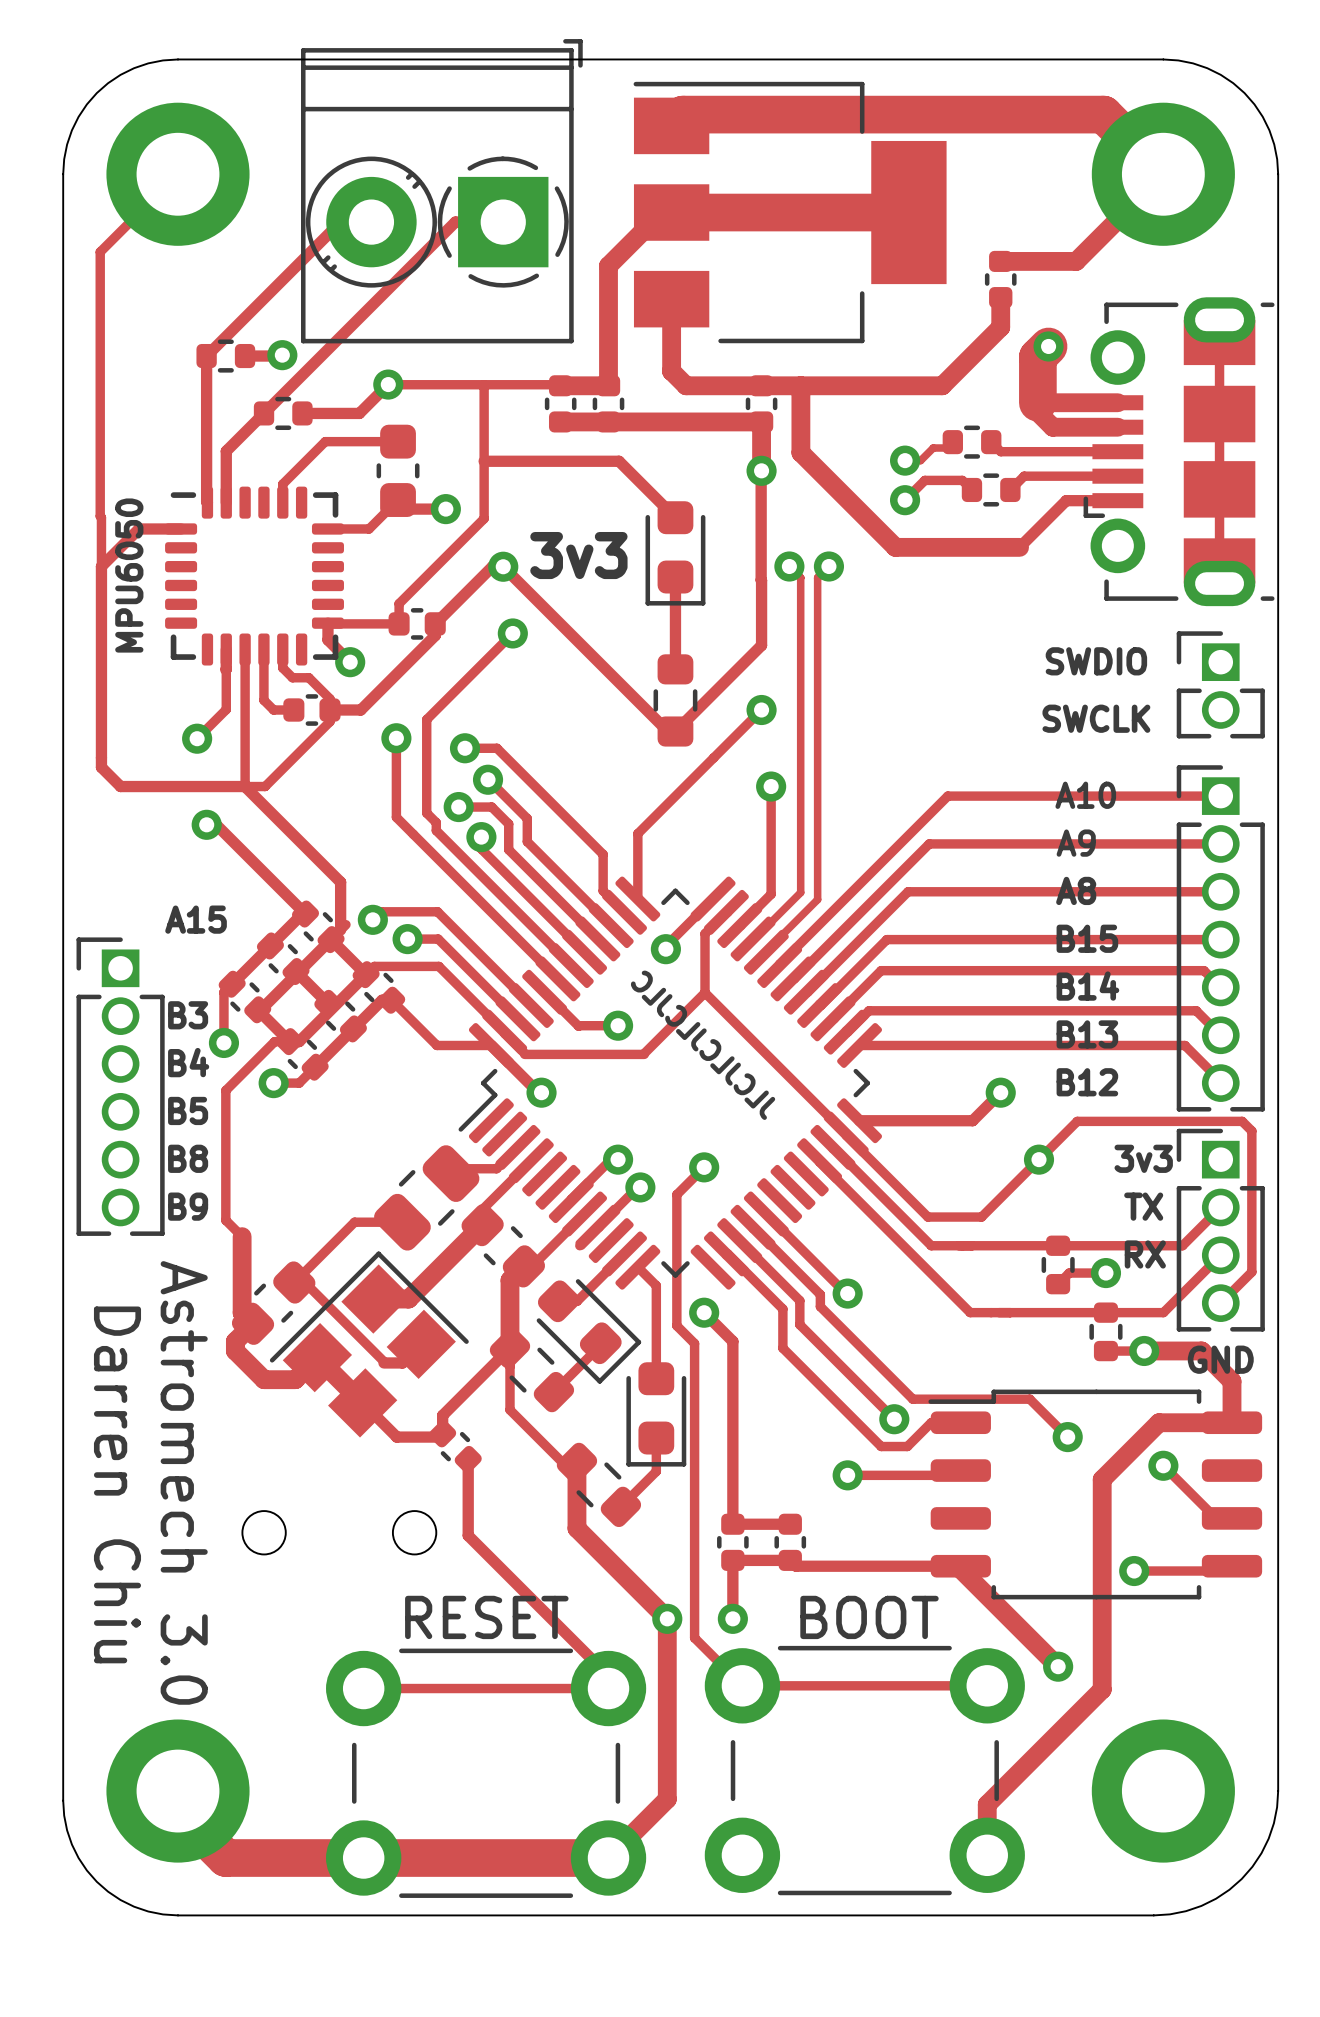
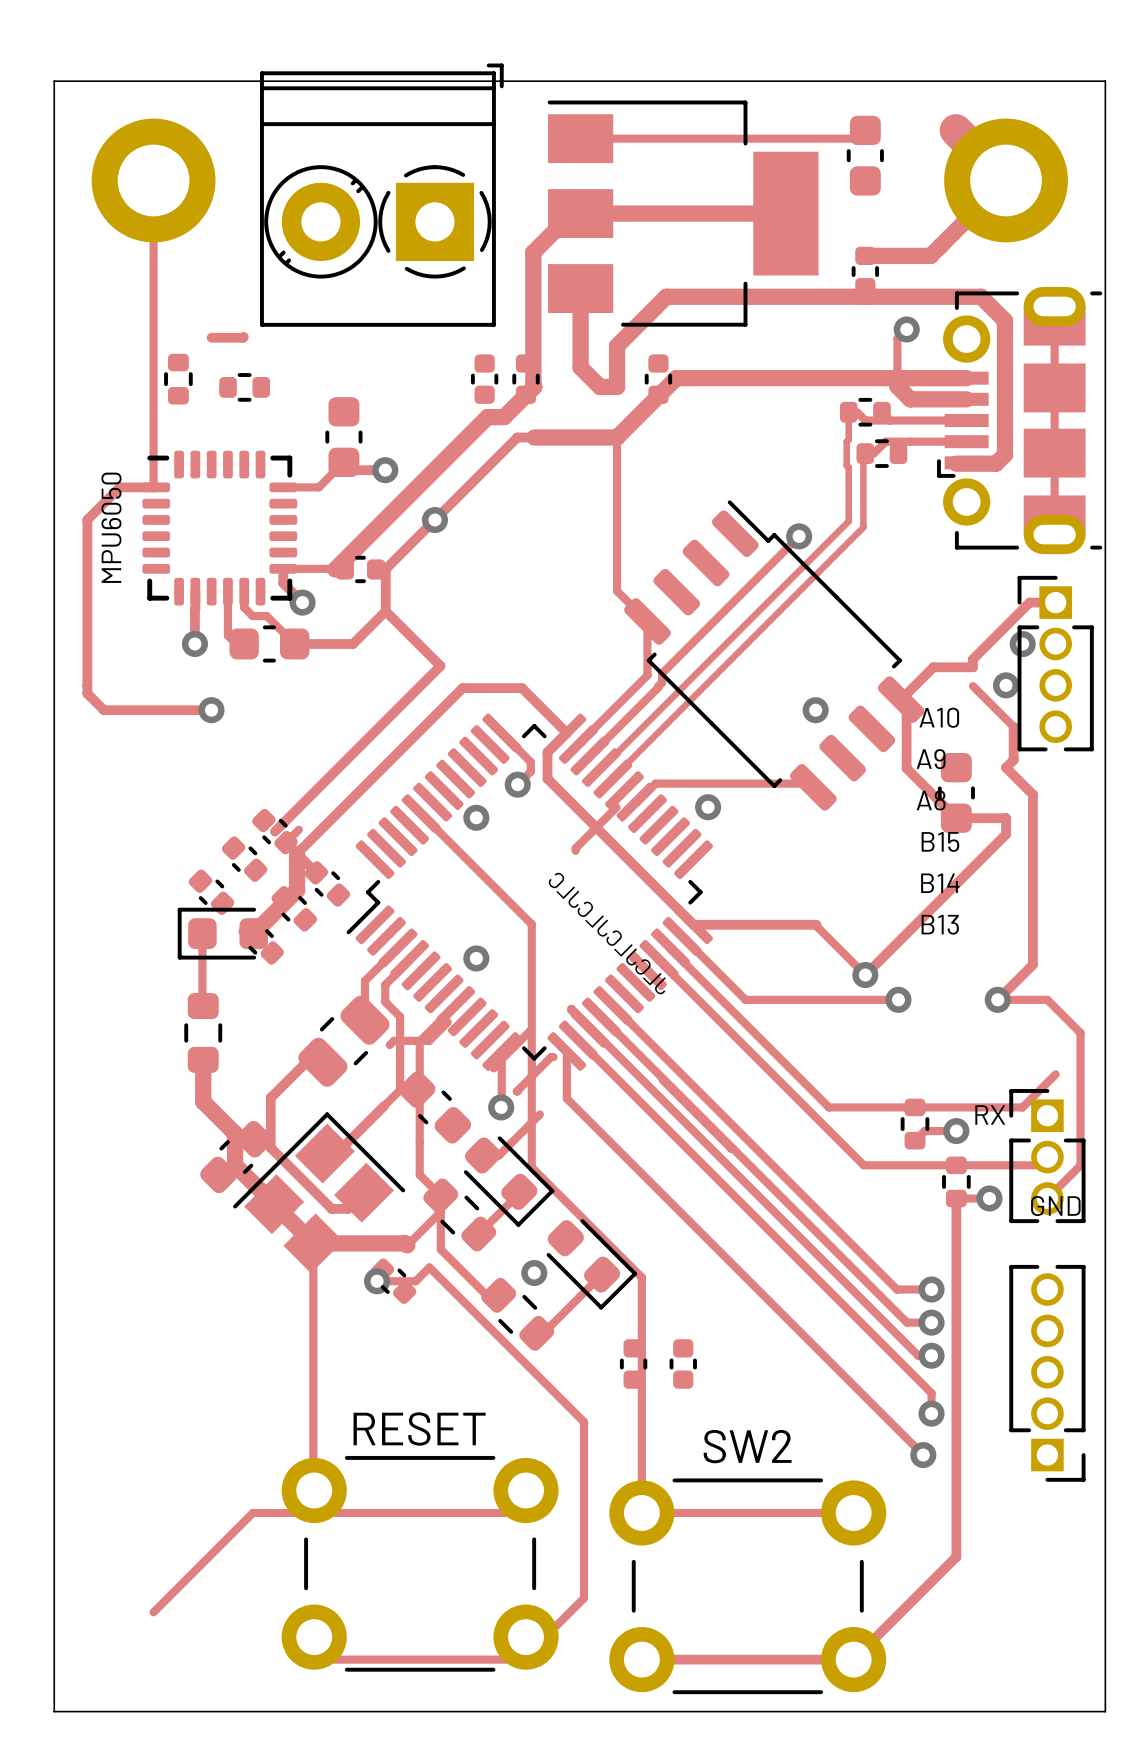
board edge: (177, 59) (148, 63) (134, 68) (120, 74) (96, 93) (86, 104) (71, 130) (67, 144) (63, 174) -> (153, 81) (54, 81) (54, 180)
board edge: (1163, 59) (1193, 63) (1207, 68) (1220, 74) (1244, 93) (1254, 104) (1269, 130) (1274, 144) (1278, 174) -> (1006, 81) (1105, 81) (1105, 180)
track: (1105, 116) (1103, 114) (682, 114) (671, 125) -> (857, 138) (580, 138)
part: none -> (865, 155)
track: (177, 174) (100, 252) (101, 566) -> (153, 180) (153, 484) (156, 487)
track width: thick (671, 212) (908, 212) -> thin (580, 213) (785, 213)
track: (332, 222) (371, 222) (340, 222) (206, 356) (206, 501) -> none
track: (503, 222) (455, 222) (226, 451) (226, 502) -> none
track: (617, 257) (608, 265) (608, 385) (388, 384) -> none
track: (1000, 297) (1000, 327) (942, 385) (686, 385) (671, 371) -> (956, 463) (995, 463) (1004, 454) (1004, 320) (981, 296) (666, 296) (617, 346) (617, 386) (600, 386) (580, 367) (580, 350)
track width: thick (1048, 346) (1037, 357) (1037, 402) -> thin (906, 329) (897, 338) (897, 378)
via: (282, 355) -> none
part rotation: 0° (225, 356) -> 90° clockwise (178, 379)
part position: (225, 356) -> (178, 379)
track: (388, 384) (359, 413) (302, 413) -> none
via: (388, 384) -> none
track: (484, 384) (484, 518) (399, 603) (399, 623) (327, 623) -> (533, 252) (534, 386) (504, 417) (487, 417) (335, 569) (283, 568)
track: (800, 385) (800, 452) (895, 547) (1019, 547) (1066, 500) (1117, 500) -> none
track: none -> (897, 378) (676, 378) (617, 437)
track: (560, 421) (761, 421) (761, 470) -> none
track: (398, 441) (325, 441) (282, 484) (282, 502) -> none
track: (952, 442) (946, 448) (933, 448) (920, 460) (905, 460) -> none
part: (972, 442) -> none
track: none -> (848, 412) (848, 439) (846, 441) (848, 521) (601, 767)
part: none -> (865, 412)
via: (905, 460) -> none
track: (484, 461) (619, 461) (675, 517) -> none
via: (761, 470) -> none
track: none -> (617, 437) (617, 591) (647, 621) (647, 675) (578, 744)
track: none -> (617, 437) (517, 437) (385, 569) (385, 611)
track: (761, 471) (761, 580) -> none
track: (971, 489) (962, 480) (924, 480) (905, 500) -> none
part: (991, 489) -> none
track: none -> (865, 453) (863, 455) (863, 527) (612, 779)
part: none -> (881, 453)
via: (905, 500) -> none
part rotation: 0° (675, 553) -> 90° clockwise (222, 933)
part position: (675, 553) -> (222, 933)
text: 3v3 (578, 555) -> none
track: (789, 566) (800, 577) (800, 892) (753, 938) -> none
via: (789, 566) -> none
track: (828, 566) (817, 577) (817, 899) (766, 952) -> none
via: (828, 566) -> none
track: (675, 577) (675, 669) -> none
track: (761, 580) (761, 645) (675, 731) (668, 731) (503, 566) (492, 566) (435, 623) (435, 635) (360, 710) -> (385, 611) (353, 643) (311, 643)
track: none -> (799, 536) (662, 673) (662, 682) (658, 687) (589, 756)
via: none -> (799, 536)
track: (512, 633) (426, 719) (426, 813) (436, 822) (436, 830) (571, 965) -> none
via: (512, 633) -> none
track: (245, 649) (245, 786) -> none
text: SWDIO (1096, 661) -> none
track: none -> (1055, 602) (1029, 602) (972, 659) (972, 667) (933, 667) (901, 699) (906, 705) (906, 768) (956, 818) (1006, 818) (1006, 834) (865, 975) (816, 924) (693, 924) (547, 778) (547, 752) (566, 732) (521, 688) (462, 688) (297, 853) (297, 890) (253, 933)
track: (226, 669) (226, 709) (197, 738) -> (194, 609) (194, 643)
track: none -> (385, 611) (440, 666) (274, 831)
part: (1220, 684) -> none
part footprint: [283, 694, 341, 726] -> [229, 625, 310, 663]
track: (330, 698) (330, 721) (265, 786) (244, 786) (340, 882) (340, 930) -> none
part position: (675, 700) -> (203, 1032)
via: none -> (194, 643)
track: (761, 710) (637, 833) (637, 899) -> none
via: (761, 710) -> none
via: none -> (1022, 644)
text: SWCLK (1096, 718) -> none
part: none -> (774, 655)
via: (197, 738) -> none
track: (396, 738) (396, 817) (557, 978) -> none
via: (396, 738) -> none
track: (465, 748) (496, 748) (603, 854) (603, 890) (624, 912) -> none
via: (465, 748) -> none
via: none -> (1006, 685)
track: (488, 779) (527, 818) (527, 841) (611, 925) -> none
via: (488, 779) -> none
via: none -> (211, 710)
track: (771, 786) (771, 894) (741, 925) -> none
via: (771, 786) -> none
via: none -> (815, 710)
track: (1220, 796) (947, 796) (779, 965) -> none
track: (458, 807) (491, 807) (508, 824) (508, 849) (597, 938) -> none
via: (458, 807) -> none
track: none -> (501, 732) (530, 762) (530, 771) (517, 784)
track: (206, 824) (216, 824) (305, 914) (302, 914) (223, 992) (223, 1042) -> none
via: (206, 824) -> none
track: (481, 837) (481, 849) (584, 952) -> none
via: (481, 837) -> none
track: (1220, 843) (929, 843) (792, 978) -> none
via: none -> (517, 784)
track: none -> (813, 787) (809, 783) (655, 783) (635, 802)
part: none -> (956, 792)
track: (1220, 891) (908, 891) (806, 992) -> none
via: none -> (708, 807)
track: none -> (421, 813) (531, 924) (531, 1167) (641, 1277) (641, 1512) (881, 1512)
via: none -> (476, 817)
track: (727, 912) (705, 933) (705, 992) -> none
text: A15 (196, 919) -> none
track: (372, 919) (380, 911) (437, 911) (531, 1005) -> none
via: (372, 919) -> none
part: (1220, 938) -> none
track: (331, 939) (260, 1009) (257, 1009) (289, 1041) -> none
track: (407, 939) (438, 939) (518, 1018) -> none
via: (407, 939) -> none
track: (1220, 939) (886, 939) (820, 1005) (819, 1004) -> none
via: (665, 949) -> none
track: (296, 971) (327, 1003) -> none
track: (1220, 987) (1204, 970) (881, 970) (834, 1018) -> none
track: (544, 992) (578, 1026) (618, 1025) -> none
track: (705, 992) (927, 1217) (981, 1217) (1077, 1121) (1153, 1121) -> (972, 686) (1013, 726) (1013, 760) (1006, 767) (1032, 794) (1032, 964) (997, 999)
track: (705, 992) (644, 1053) -> none
text: B3 (188, 1015) -> none
via: (618, 1025) -> none
track: (846, 1030) (847, 1032) (868, 1010) (1196, 1010) (1220, 1035) -> none
track: (289, 1041) (274, 1041) (225, 1090) (225, 1220) (242, 1236) (242, 1312) (253, 1323) (235, 1341) (235, 1350) (264, 1379) (295, 1379) (317, 1357) -> (203, 1059) (203, 1101) (235, 1133) (235, 1165) (274, 1204)
track: (289, 1041) (299, 1041) (374, 966) (438, 966) (524, 1053) -> none
via: (223, 1042) -> none
track: none -> (202, 933) (203, 1006)
track: (859, 1045) (1185, 1045) (1220, 1083) -> none
track: none -> (682, 936) (745, 999) (898, 999)
track: (524, 1054) (644, 1054) -> none
track: none -> (398, 947) (364, 980) (364, 1020)
text: B4 (188, 1062) -> none
track: none -> (409, 959) (385, 984) (385, 1001) (400, 1016) (400, 1090) (336, 1153)
text: B12 (1087, 1082) -> none
track: (273, 1083) (299, 1083) (382, 1000) (391, 1000) (436, 1045) (491, 1045) (538, 1092) (541, 1092) -> none
via: (273, 1083) -> none
part position: (670, 1083) -> (529, 892)
part: (120, 1086) -> none
via position: (541, 1092) -> (476, 958)
track: (1000, 1092) (972, 1120) (859, 1120) -> none
text: B5 (188, 1110) -> none
via: none -> (997, 999)
track: (1211, 1121) (1242, 1121) (1251, 1131) (1251, 1272) (1220, 1303) -> (1047, 999) (1080, 1032) (1080, 1165) (1047, 1198)
track: none -> (455, 1005) (419, 1041) (419, 1174) (440, 1196)
track: none -> (612, 1005) (896, 1289) (931, 1289)
track: none -> (601, 1016) (907, 1322) (931, 1322)
track: (832, 1148) (931, 1245) (958, 1245) -> (670, 947) (828, 1107)
track: none -> (589, 1028) (571, 1008) (918, 1355) (931, 1355)
text: B8 (188, 1158) -> none
text: 3v3 (1143, 1158) -> none
via: (618, 1159) -> none
via position: (1039, 1159) -> (898, 999)
track: (531, 1160) (482, 1209) (482, 1225) (408, 1299) (375, 1299) -> none
track: (819, 1160) (970, 1312) (998, 1312) -> (658, 959) (863, 1165)
track: none -> (578, 1040) (931, 1393) (931, 1413)
track: (704, 1167) (676, 1194) (676, 1325) (694, 1343) (694, 1637) (742, 1685) (987, 1685) -> none
via: (704, 1167) -> none
track: none -> (501, 1051) (501, 1106)
track: none -> (566, 1051) (566, 1098) (923, 1455)
via: (640, 1187) -> none
part position: (426, 1197) -> (343, 1041)
text: B9 (188, 1206) -> none
text: TX (1143, 1206) -> none
track: (584, 1213) (532, 1266) (523, 1266) (509, 1280) (509, 1348) (442, 1415) (442, 1433) (439, 1437) (396, 1437) (362, 1402) -> none
track: (402, 1222) (354, 1222) (294, 1282) (304, 1282) (383, 1362) -> (322, 1062) (306, 1062) (270, 1097) (270, 1147) (331, 1208)
track: (753, 1228) (820, 1294) (820, 1306) (912, 1399) (1029, 1399) (1067, 1437) -> none
part position: (1220, 1230) -> (1055, 663)
track: (739, 1240) (799, 1300) (799, 1324) (894, 1419) -> none
via: none -> (501, 1107)
track: (726, 1255) (727, 1253) (782, 1309) (782, 1348) (881, 1446) (907, 1446) (931, 1422) (960, 1422) -> none
track: (1220, 1255) (1163, 1312) -> (1047, 1157) (1039, 1165) (1006, 1165)
track: (637, 1267) (656, 1285) (656, 1378) -> none
via: (847, 1293) -> none
part: none -> (1047, 1156)
track: (704, 1312) (732, 1341) (732, 1524) (790, 1524) -> none
via: (704, 1312) -> none
track: (1144, 1350) (1201, 1350) (1232, 1381) (1232, 1422) (1159, 1422) (1102, 1479) (1102, 1689) (987, 1804) (987, 1855) -> none
track: none -> (956, 1198) (956, 1556) (853, 1659) (641, 1659)
track: none -> (440, 1211) (407, 1245) (405, 1243) (313, 1243) (313, 1510) (310, 1512)
part rotation: 0° (656, 1414) -> 45° counterclockwise (591, 1264)
via: (894, 1419) -> none
via: none -> (534, 1272)
via position: (1067, 1437) -> (931, 1289)
track: (656, 1438) (656, 1471) (620, 1506) -> none
track: none -> (602, 1274) (543, 1333)
track: none -> (377, 1281) (415, 1281) (429, 1267) (583, 1421) (583, 1598) (522, 1659) (310, 1659)
via: none -> (377, 1281)
track: (468, 1459) (468, 1535) (608, 1675) (608, 1688) (363, 1688) -> none
track: (576, 1462) (576, 1528) (667, 1618) (667, 1799) (608, 1858) (225, 1858) (177, 1810) (177, 1791) -> none
track: (1163, 1465) (1215, 1518) (1232, 1518) -> none
via: (1163, 1465) -> none
track: (960, 1470) (956, 1475) (847, 1475) -> none
via: (847, 1475) -> none
text: Astromech 3.0 (184, 1482) -> none
text: Darren Chiu (117, 1484) -> none
via: none -> (931, 1322)
part: (1095, 1494) -> none
round board edge: [241, 1510, 287, 1556] -> none
round board edge: [391, 1510, 438, 1556] -> none
via: none -> (931, 1355)
part: none -> (1047, 1373)
track: (1232, 1566) (1227, 1571) (1134, 1571) -> none
via: (1134, 1571) -> none
via: none -> (931, 1413)
text: BOOT (869, 1617) -> none
via: (667, 1618) -> none
track: (732, 1618) (732, 1560) (790, 1560) (796, 1566) (960, 1566) (960, 1569) (1058, 1666) -> none
via: (732, 1618) -> none
SW2 name: none -> SW2 (747, 1446)
via position: (1058, 1666) -> (923, 1455)
track: none -> (522, 1512) (252, 1512) (153, 1612)
SW2 position: (864, 1770) -> (747, 1586)
part: (177, 1791) -> none
part: (1163, 1791) -> none
board edge: (1278, 1791) (1277, 1807) (1268, 1838) (1252, 1866) (1241, 1878) (1215, 1898) (1201, 1905) (1170, 1914) (1153, 1915) (163, 1914) (134, 1906) (120, 1900) (108, 1891) (86, 1870) (78, 1858) (67, 1830) (63, 1800) -> (1105, 1579) (1105, 1711) (54, 1711) (54, 1587)

